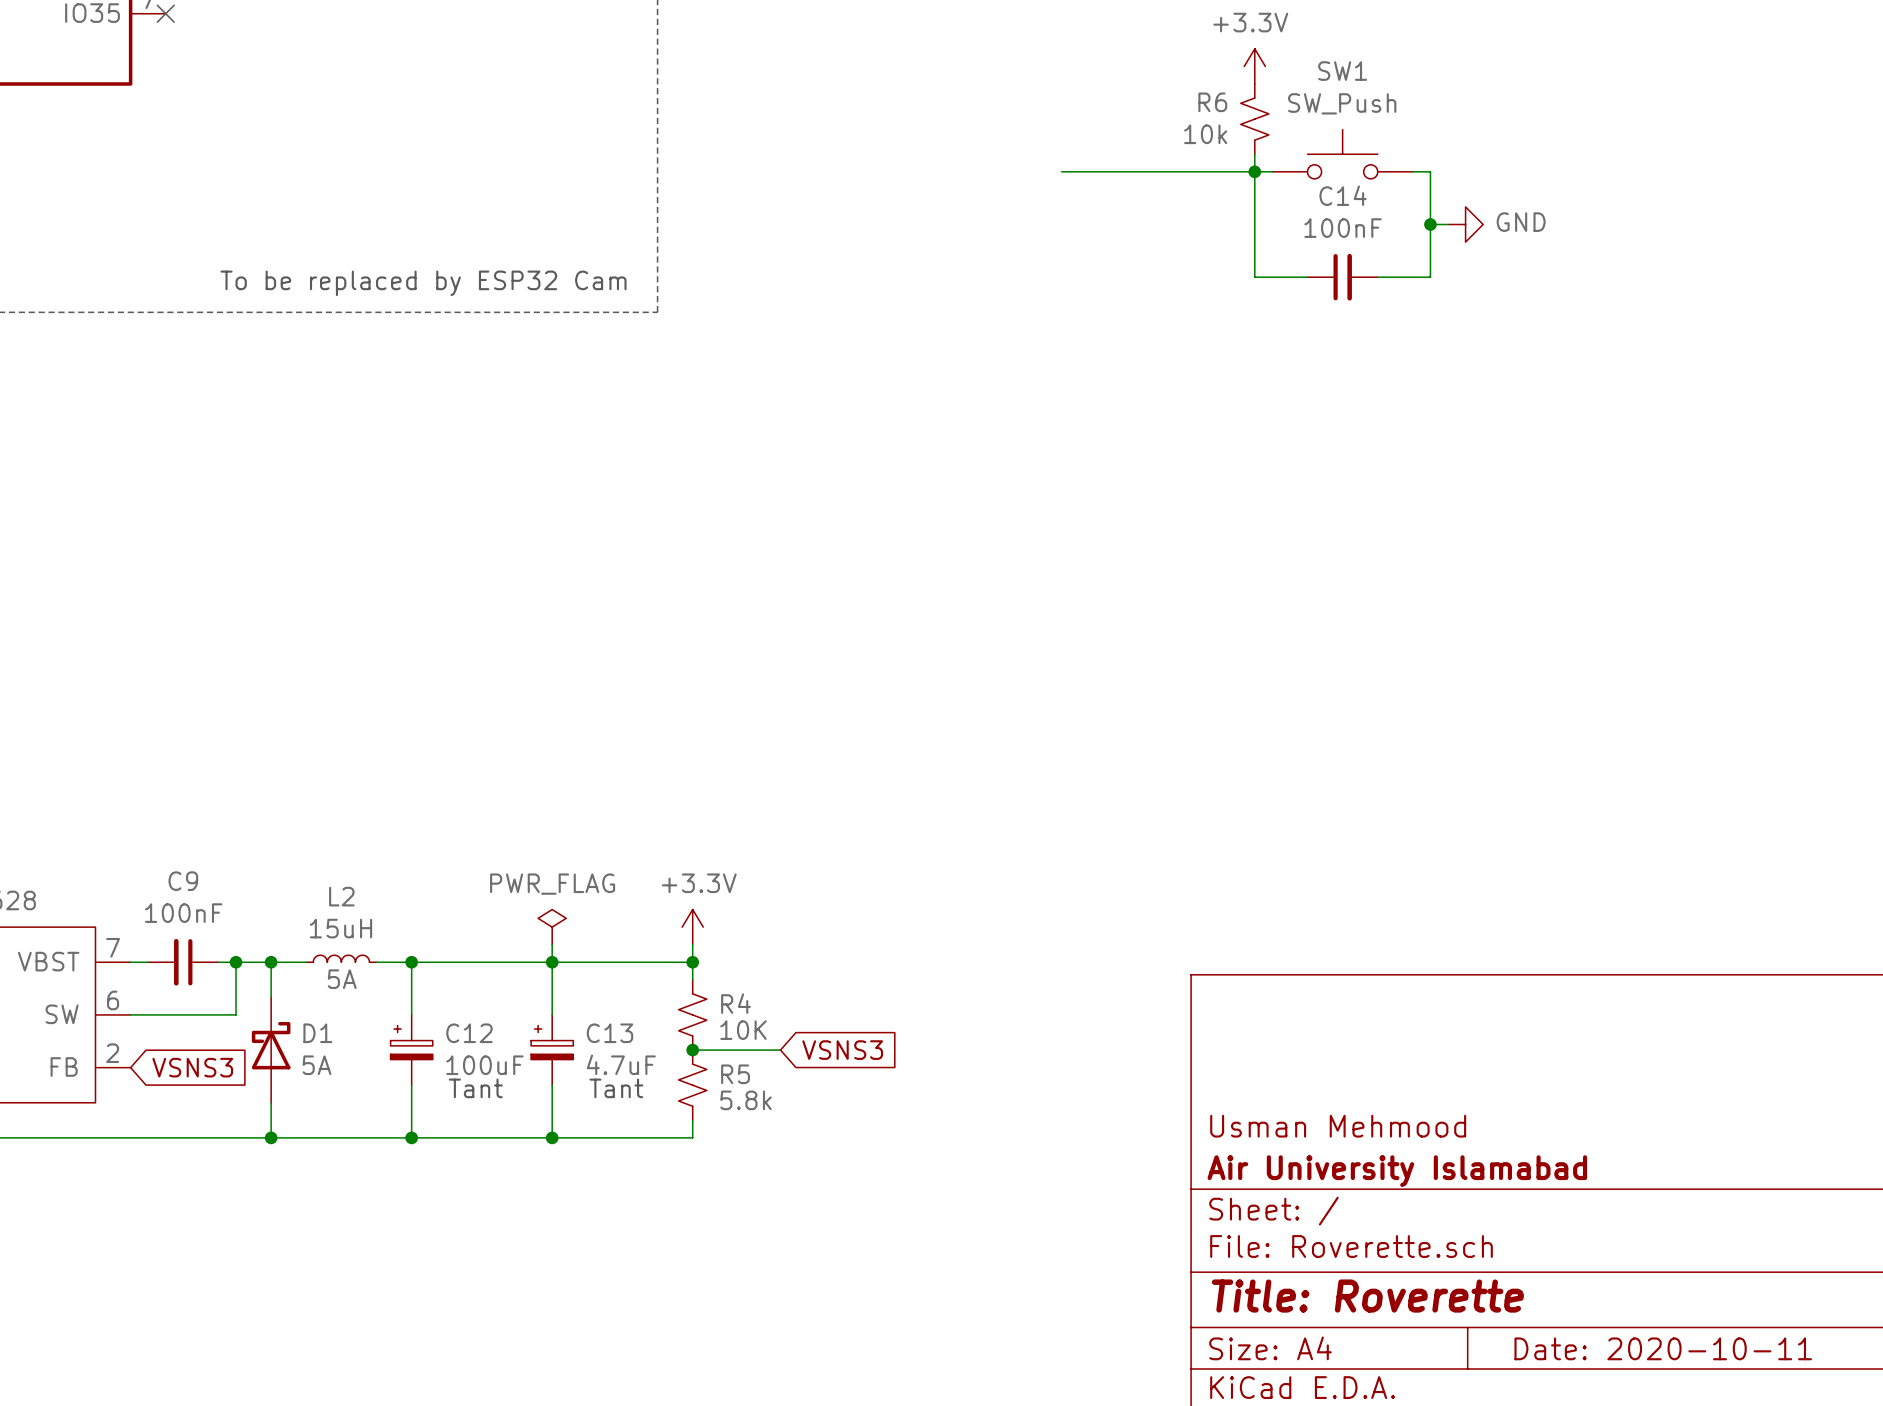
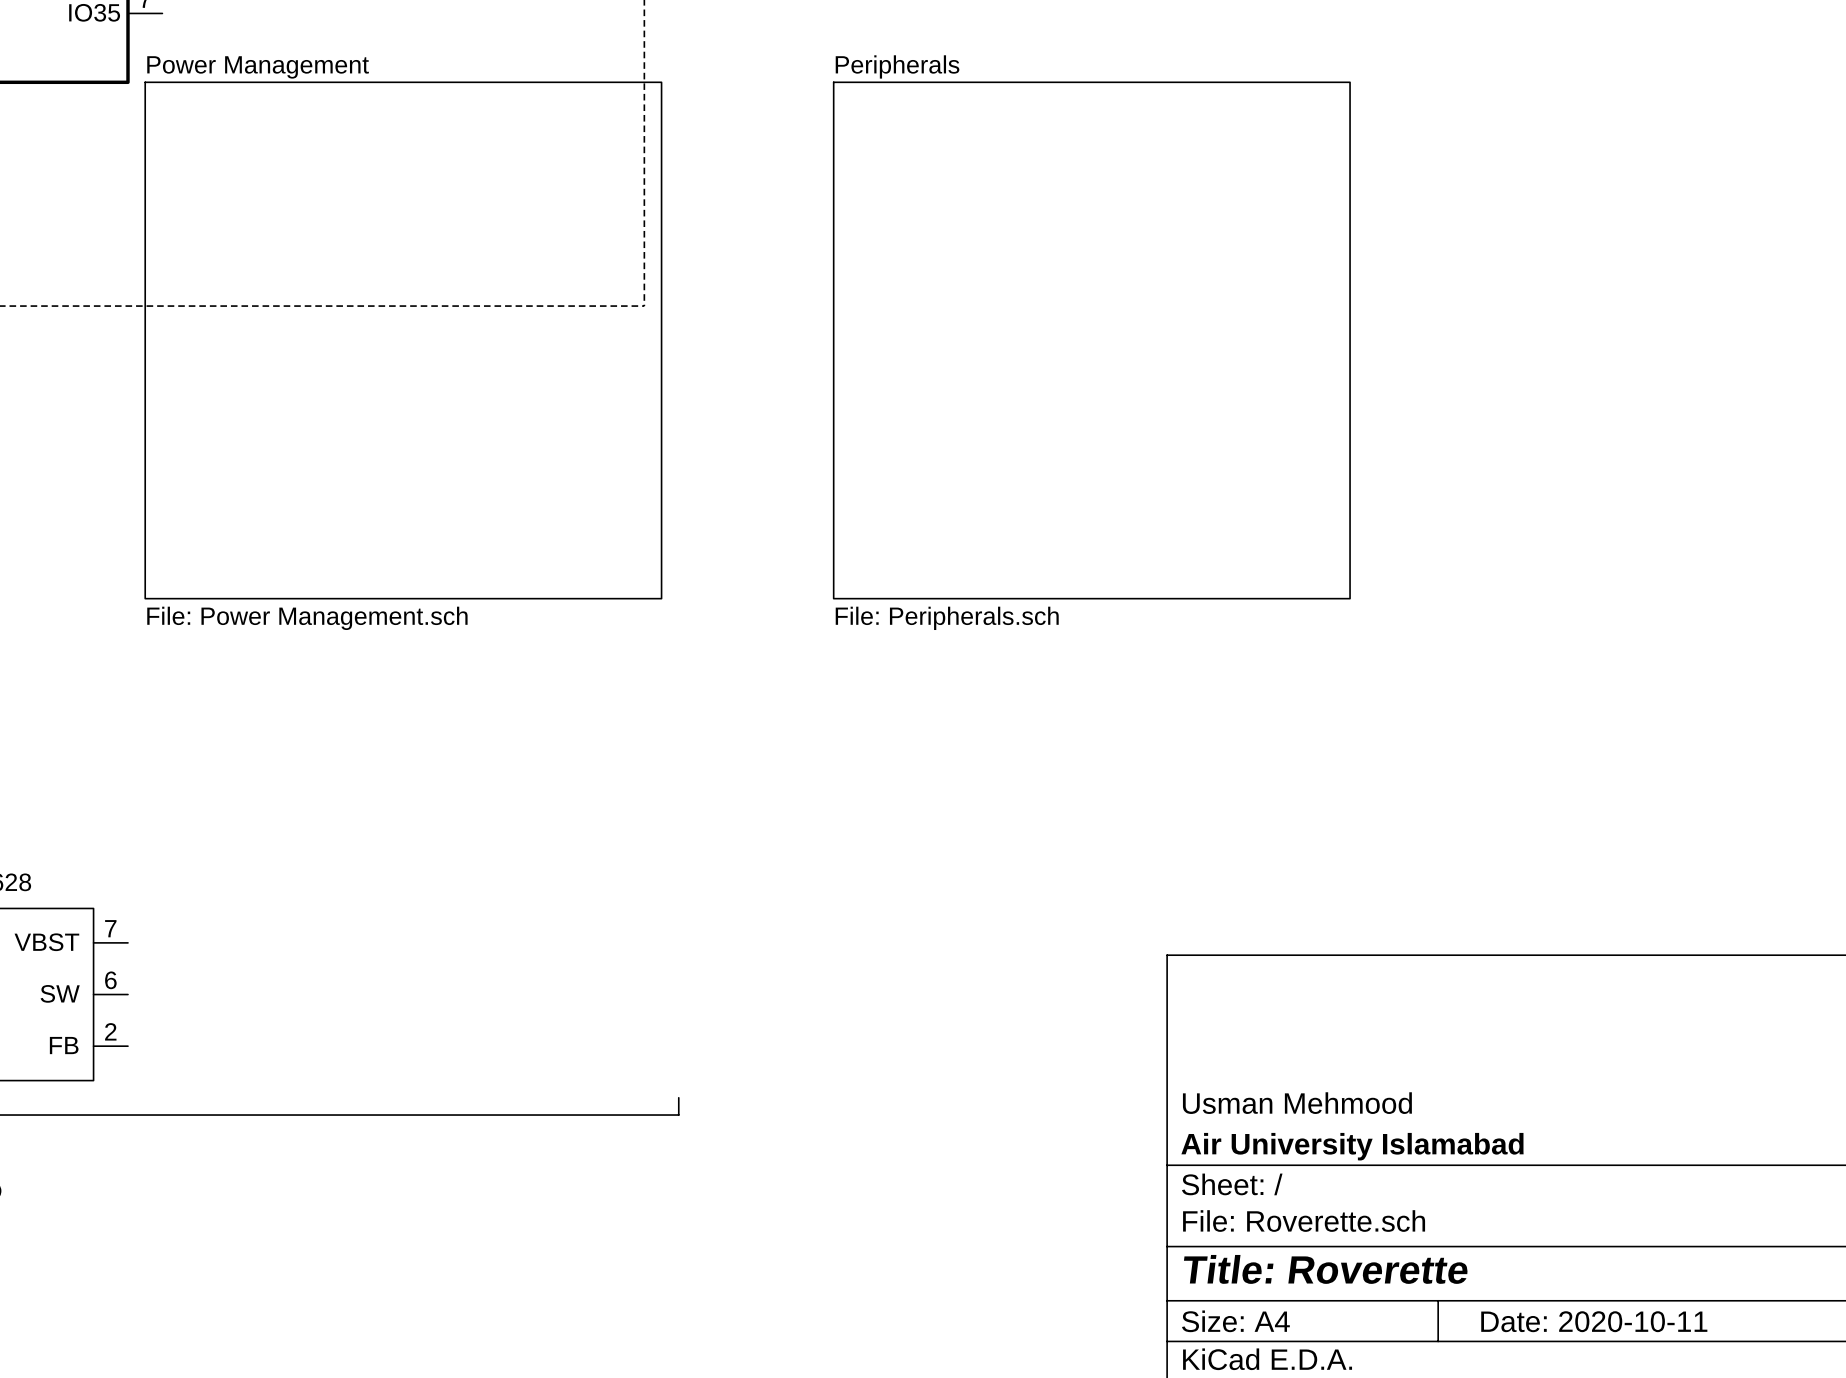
no-connect mark: (165, 13) -> none
power symbol: +3.3V (1254, 66) -> none
R6: 10k (1254, 119) -> none
wire: (1254, 154) (1254, 277) (1307, 277) -> none
SW1: SW_Push (1342, 154) -> none
wire: (1061, 171) (1272, 171) -> none
junction: (1254, 171) -> none
wire: (1412, 171) (1430, 171) (1430, 277) (1377, 277) -> none
wire: (1430, 224) (1448, 224) -> none
junction: (1430, 224) -> none
power symbol: GND (1465, 224) -> none
C14: 100nF (1342, 277) -> none
text: To be replaced by ESP32 Cam (423, 283) -> none
sheet Power Management: none -> File: Power Management.sch (403, 340)
sheet Peripherals: none -> File: Peripherals.sch (1091, 340)
power symbol: PWR_FLAG (552, 927) -> none
power symbol: +3.3V (692, 927) -> none
wire: (552, 944) (552, 1014) -> none
wire: (692, 944) (692, 979) -> none
L2: 15uH (341, 958) -> none
wire: (130, 962) (148, 962) -> none
C9: 100nF (183, 962) -> none
wire: (218, 962) (306, 962) -> none
wire: (236, 962) (236, 1014) (130, 1014) -> none
junction: (236, 962) -> none
wire: (271, 962) (271, 997) -> none
junction: (271, 962) -> none
wire: (376, 962) (692, 962) -> none
wire: (411, 962) (411, 1014) -> none
junction: (411, 962) -> none
junction: (552, 962) -> none
junction: (692, 962) -> none
R4: 10K (692, 1014) -> none
D1: 5A (271, 1050) -> none
C12: 100uF (411, 1050) -> none
C13: 4.7uF (552, 1050) -> none
wire: (692, 1050) (780, 1050) -> none
junction: (692, 1050) -> none
global label: VSNS3 (842, 1050) -> none
global label: VSNS3 (192, 1067) -> none
wire: (411, 1085) (411, 1137) -> none
wire: (552, 1085) (552, 1137) -> none
R5: 5.8k (692, 1085) -> none
text: Tant (475, 1088) -> none
text: Tant (616, 1088) -> none
wire: (271, 1102) (271, 1137) -> none
junction: (271, 1137) -> none
junction: (411, 1137) -> none
junction: (552, 1137) -> none

